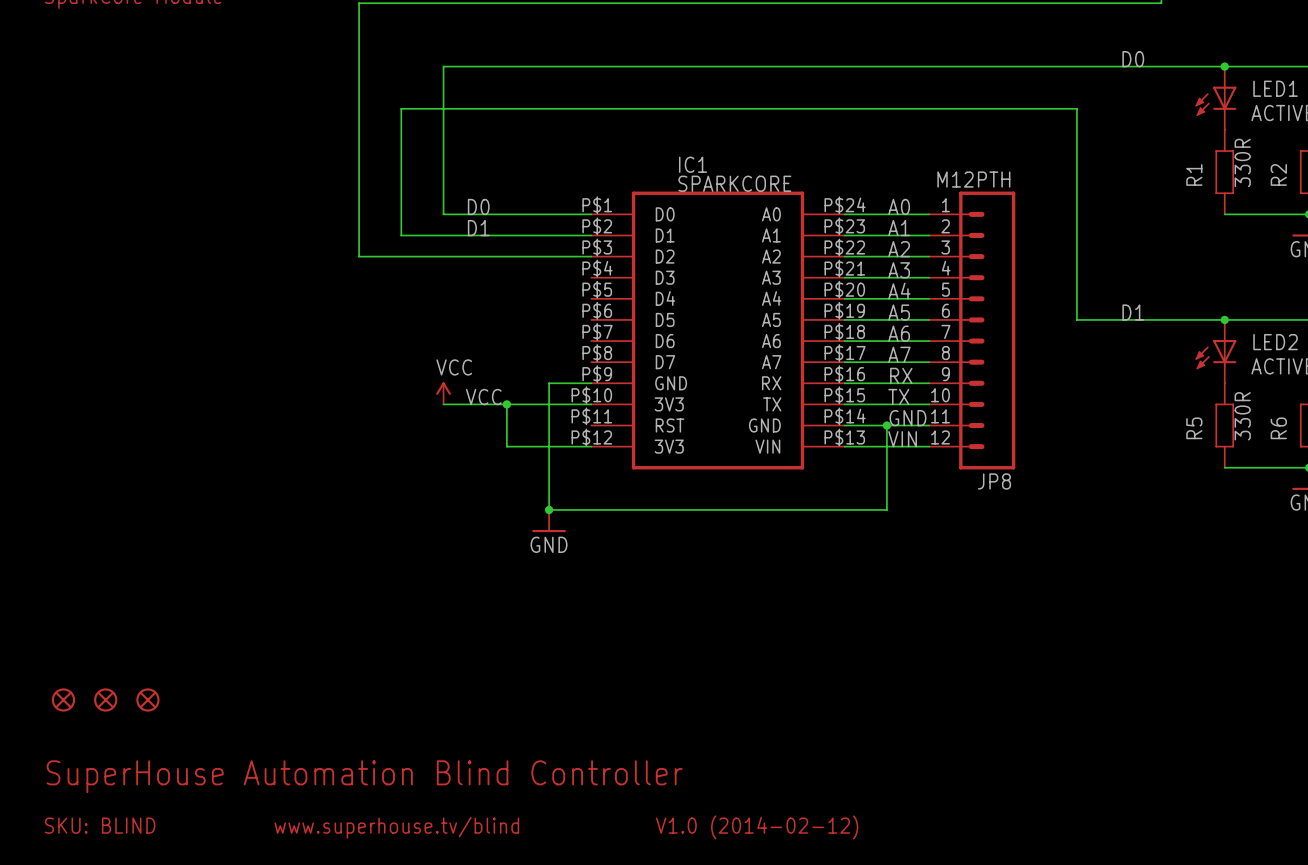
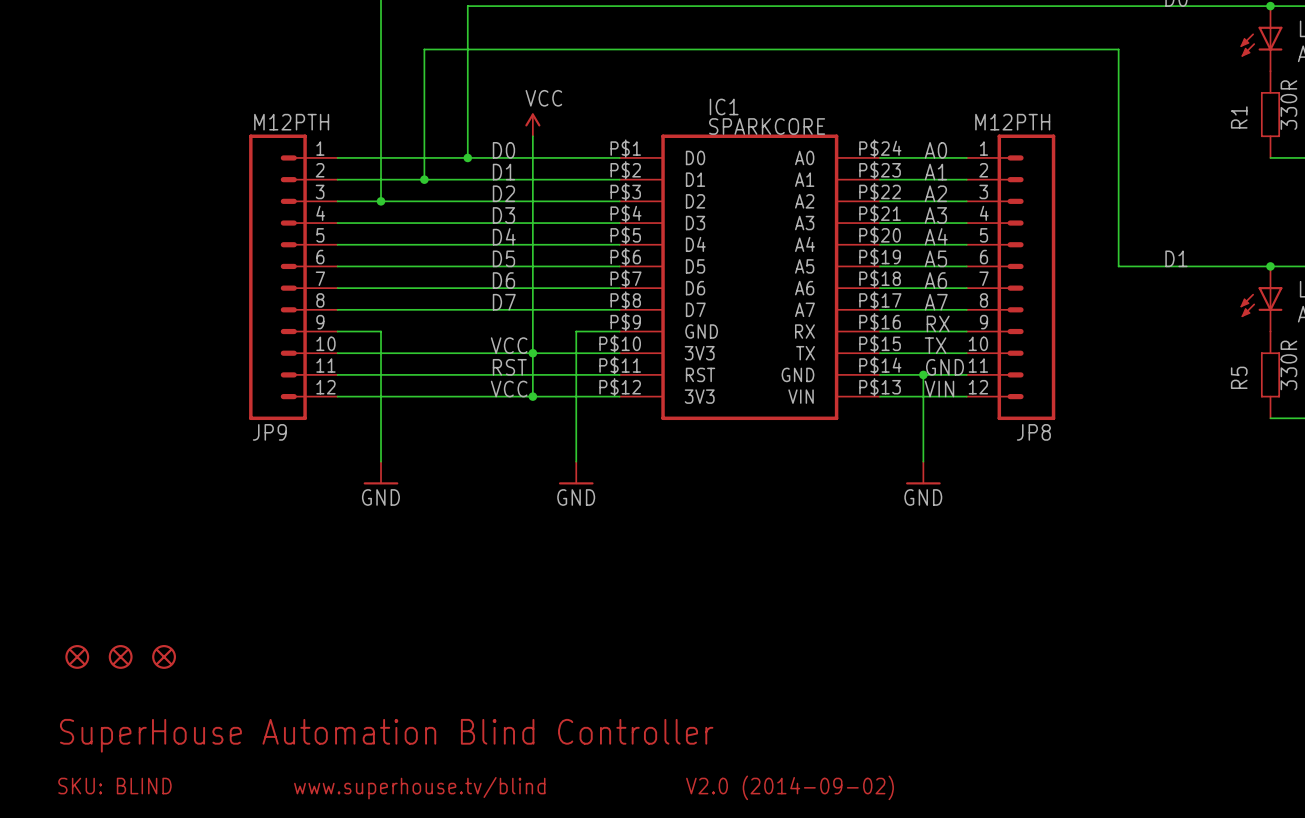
power symbol: none -> VCC (532, 124)
wire: none -> (532, 136) (532, 353)
wire: none -> (337, 157) (467, 157)
junction: none -> (467, 157)
wire: none -> (337, 179) (424, 179)
junction: none -> (424, 179)
label: none -> D2 (503, 193)
wire: none -> (337, 201) (381, 201)
junction: none -> (381, 201)
label: none -> D3 (503, 215)
wire: none -> (337, 223) (619, 223)
label: none -> D4 (504, 236)
wire: none -> (337, 244) (619, 244)
label: none -> D5 (503, 258)
wire: none -> (337, 266) (619, 266)
JP9: none -> M12PTH (293, 277)
label: none -> D6 (503, 280)
wire: none -> (337, 288) (619, 288)
label: none -> D7 (504, 302)
wire: none -> (337, 309) (619, 309)
wire: none -> (337, 331) (381, 331) (381, 461)
power symbol: VCC (443, 393) -> none
wire: none -> (337, 353) (467, 353)
label: none -> RST (509, 367)
wire: none -> (337, 374) (619, 374)
label: none -> VCC (509, 389)
wire: none -> (337, 396) (532, 396)
junction: none -> (532, 396)
wire: (549, 509) (886, 509) -> none
junction: (549, 509) -> none
power symbol: none -> GND (381, 473)
power symbol: none -> GND (923, 473)
text: V1.0 (2014-02-12) (757, 827) -> V2.0 (2014-09-02) (789, 787)

